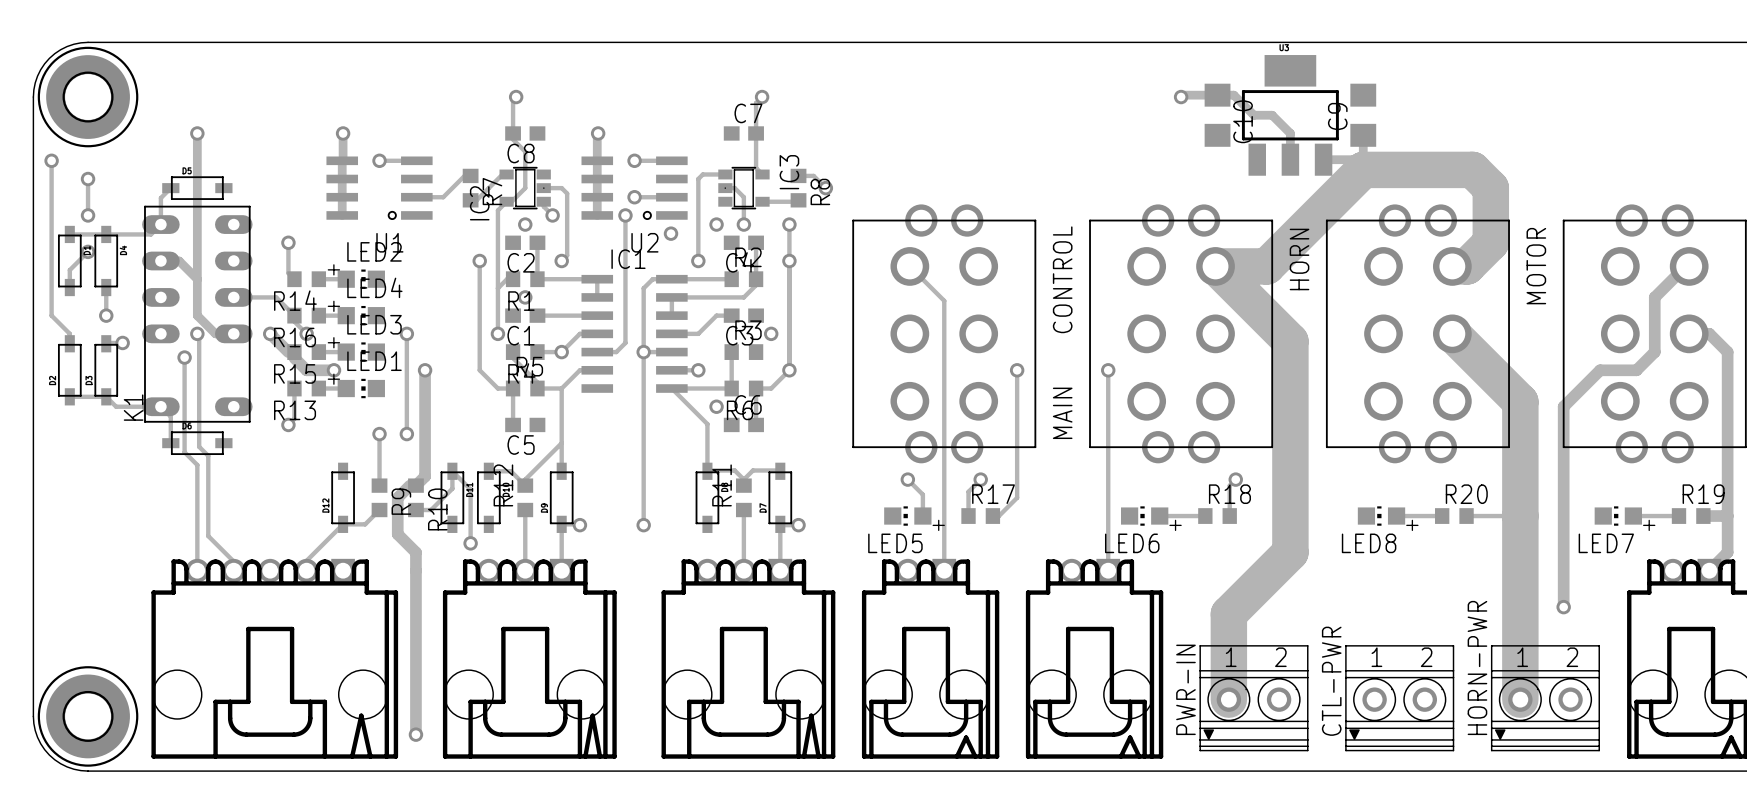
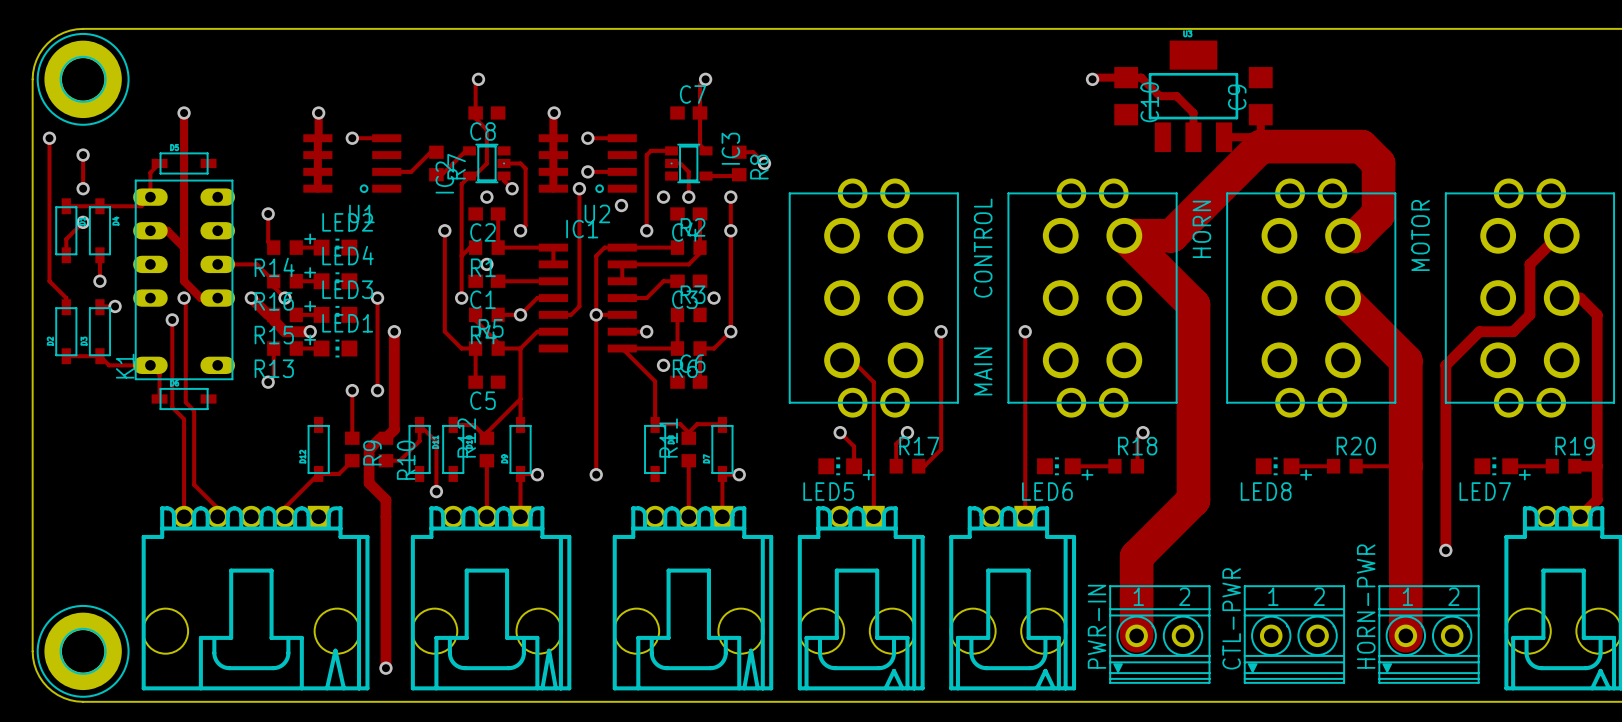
track: (909, 266) (944, 300) (944, 424) -> (842, 360) (851, 360) (873, 382)

